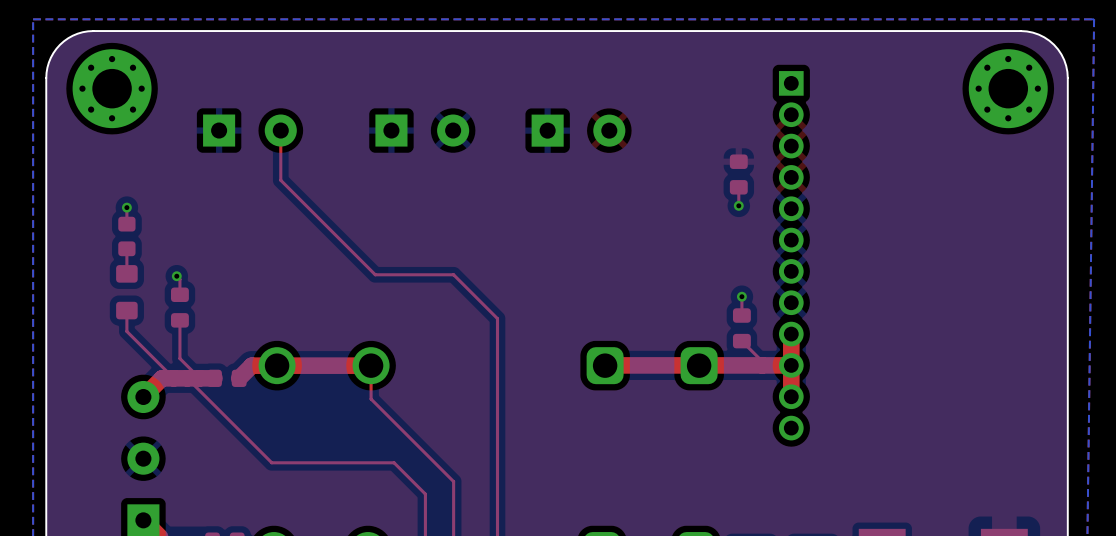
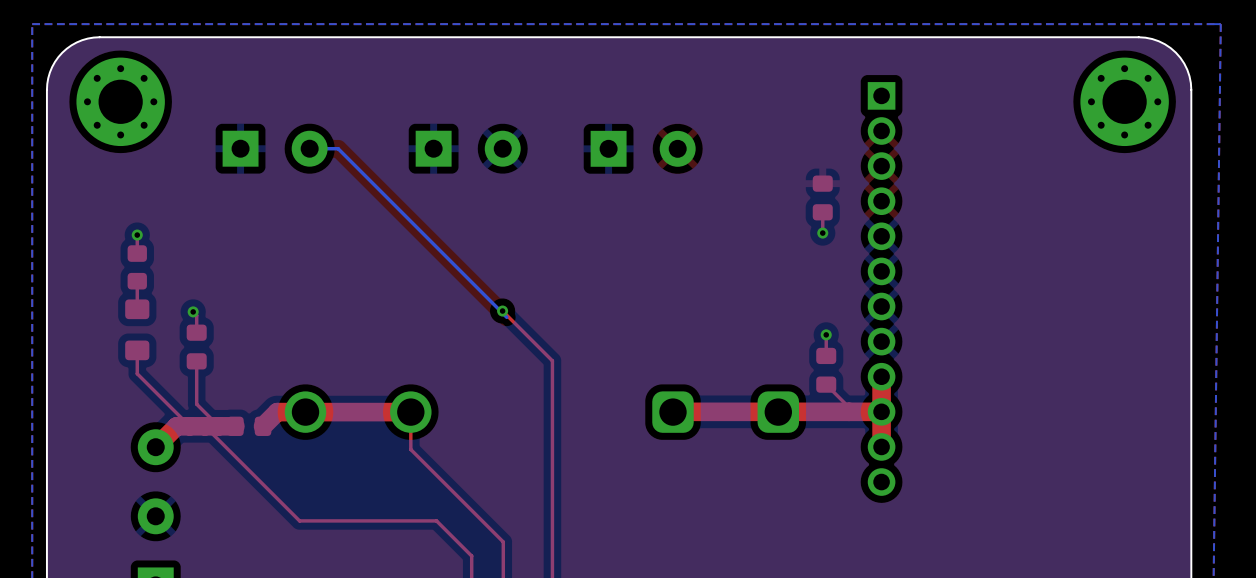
top track: (280, 130) (280, 180) (375, 274) (453, 274) (497, 319) -> (503, 310) (552, 360)
bottom track: none -> (309, 148) (338, 148) (506, 317)
via: none -> (502, 311)

